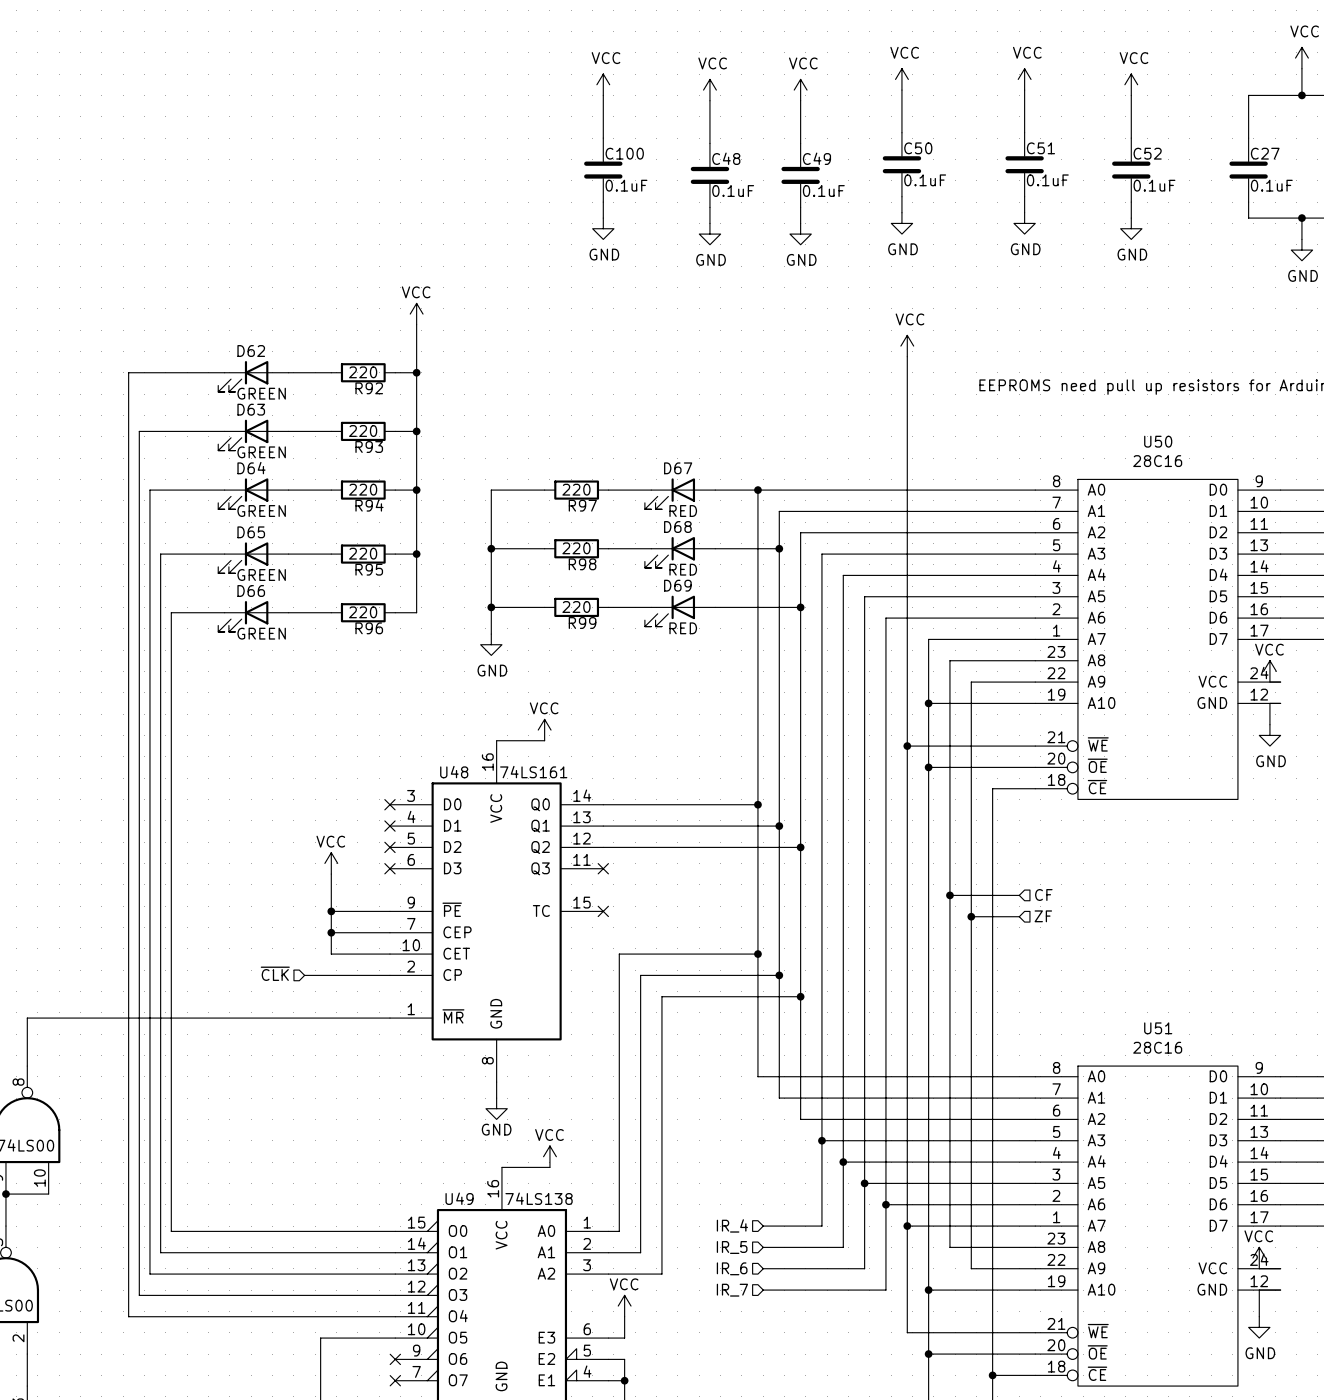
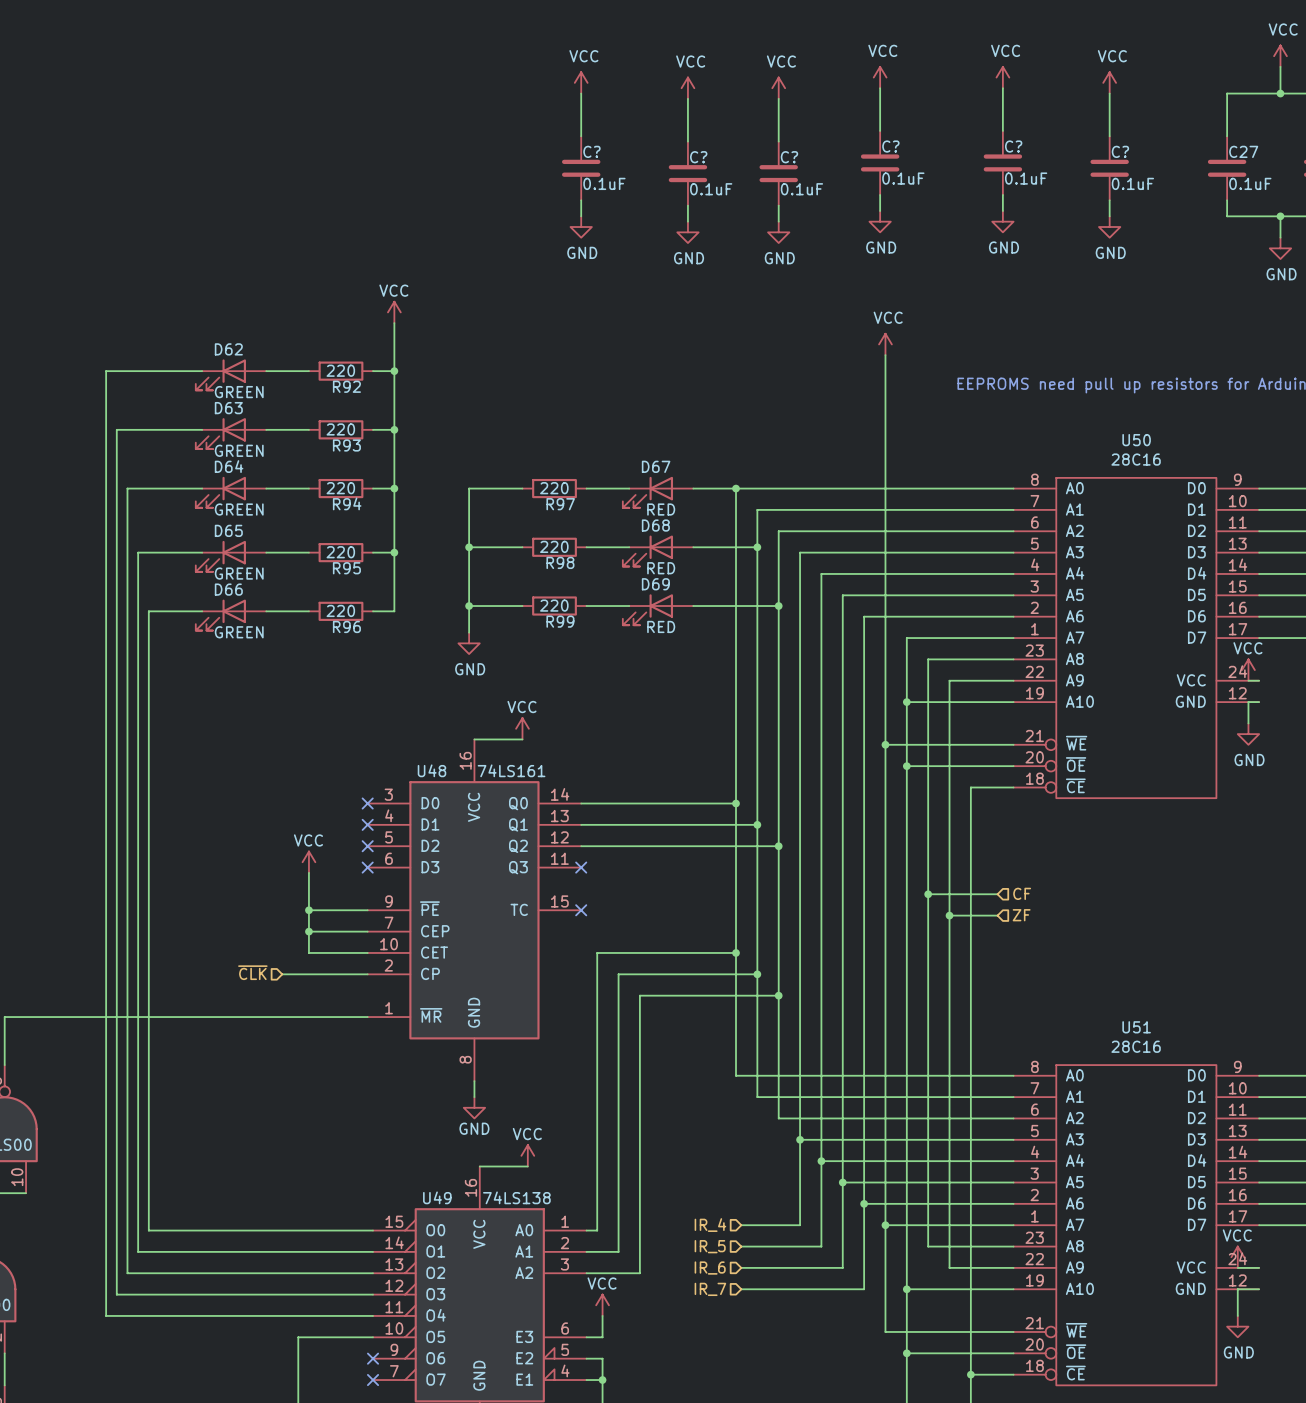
C50 name: C50 (918, 148) -> C? (890, 146)
C51 name: C51 (1040, 148) -> C? (1013, 146)
C100 name: C100 (624, 153) -> C? (591, 151)
C52 name: C52 (1147, 153) -> C? (1120, 151)
C48 name: C48 (726, 158) -> C? (698, 157)
C49 name: C49 (816, 158) -> C? (789, 157)

